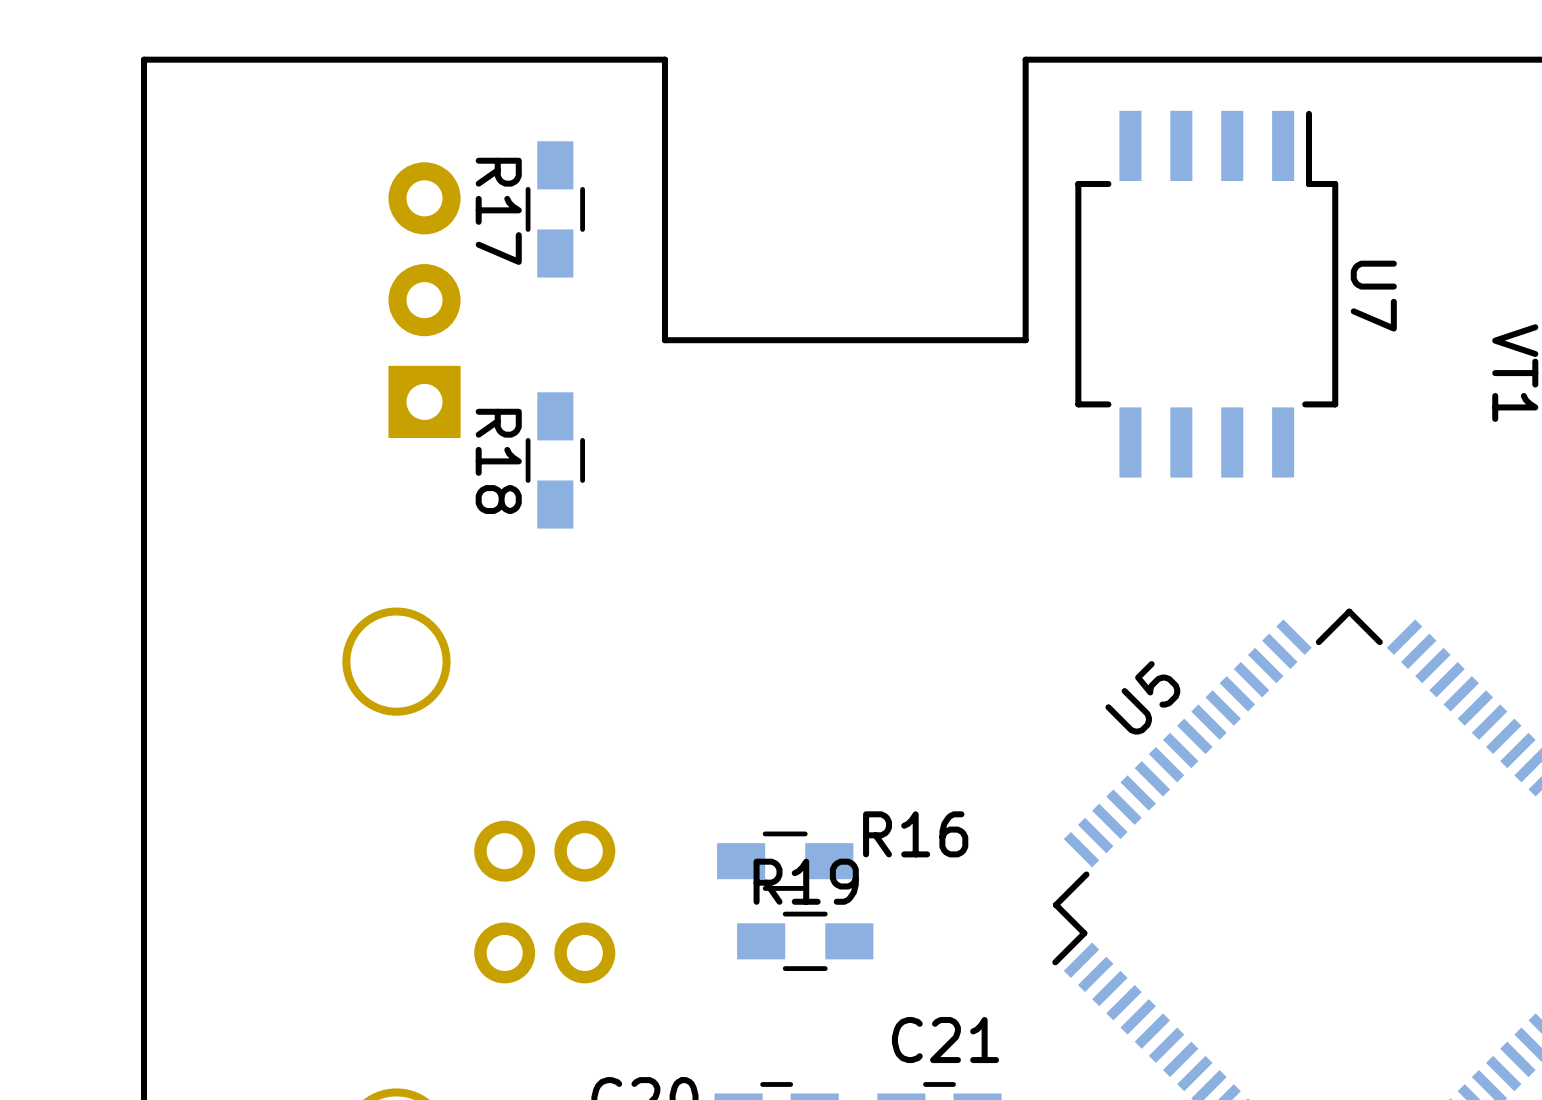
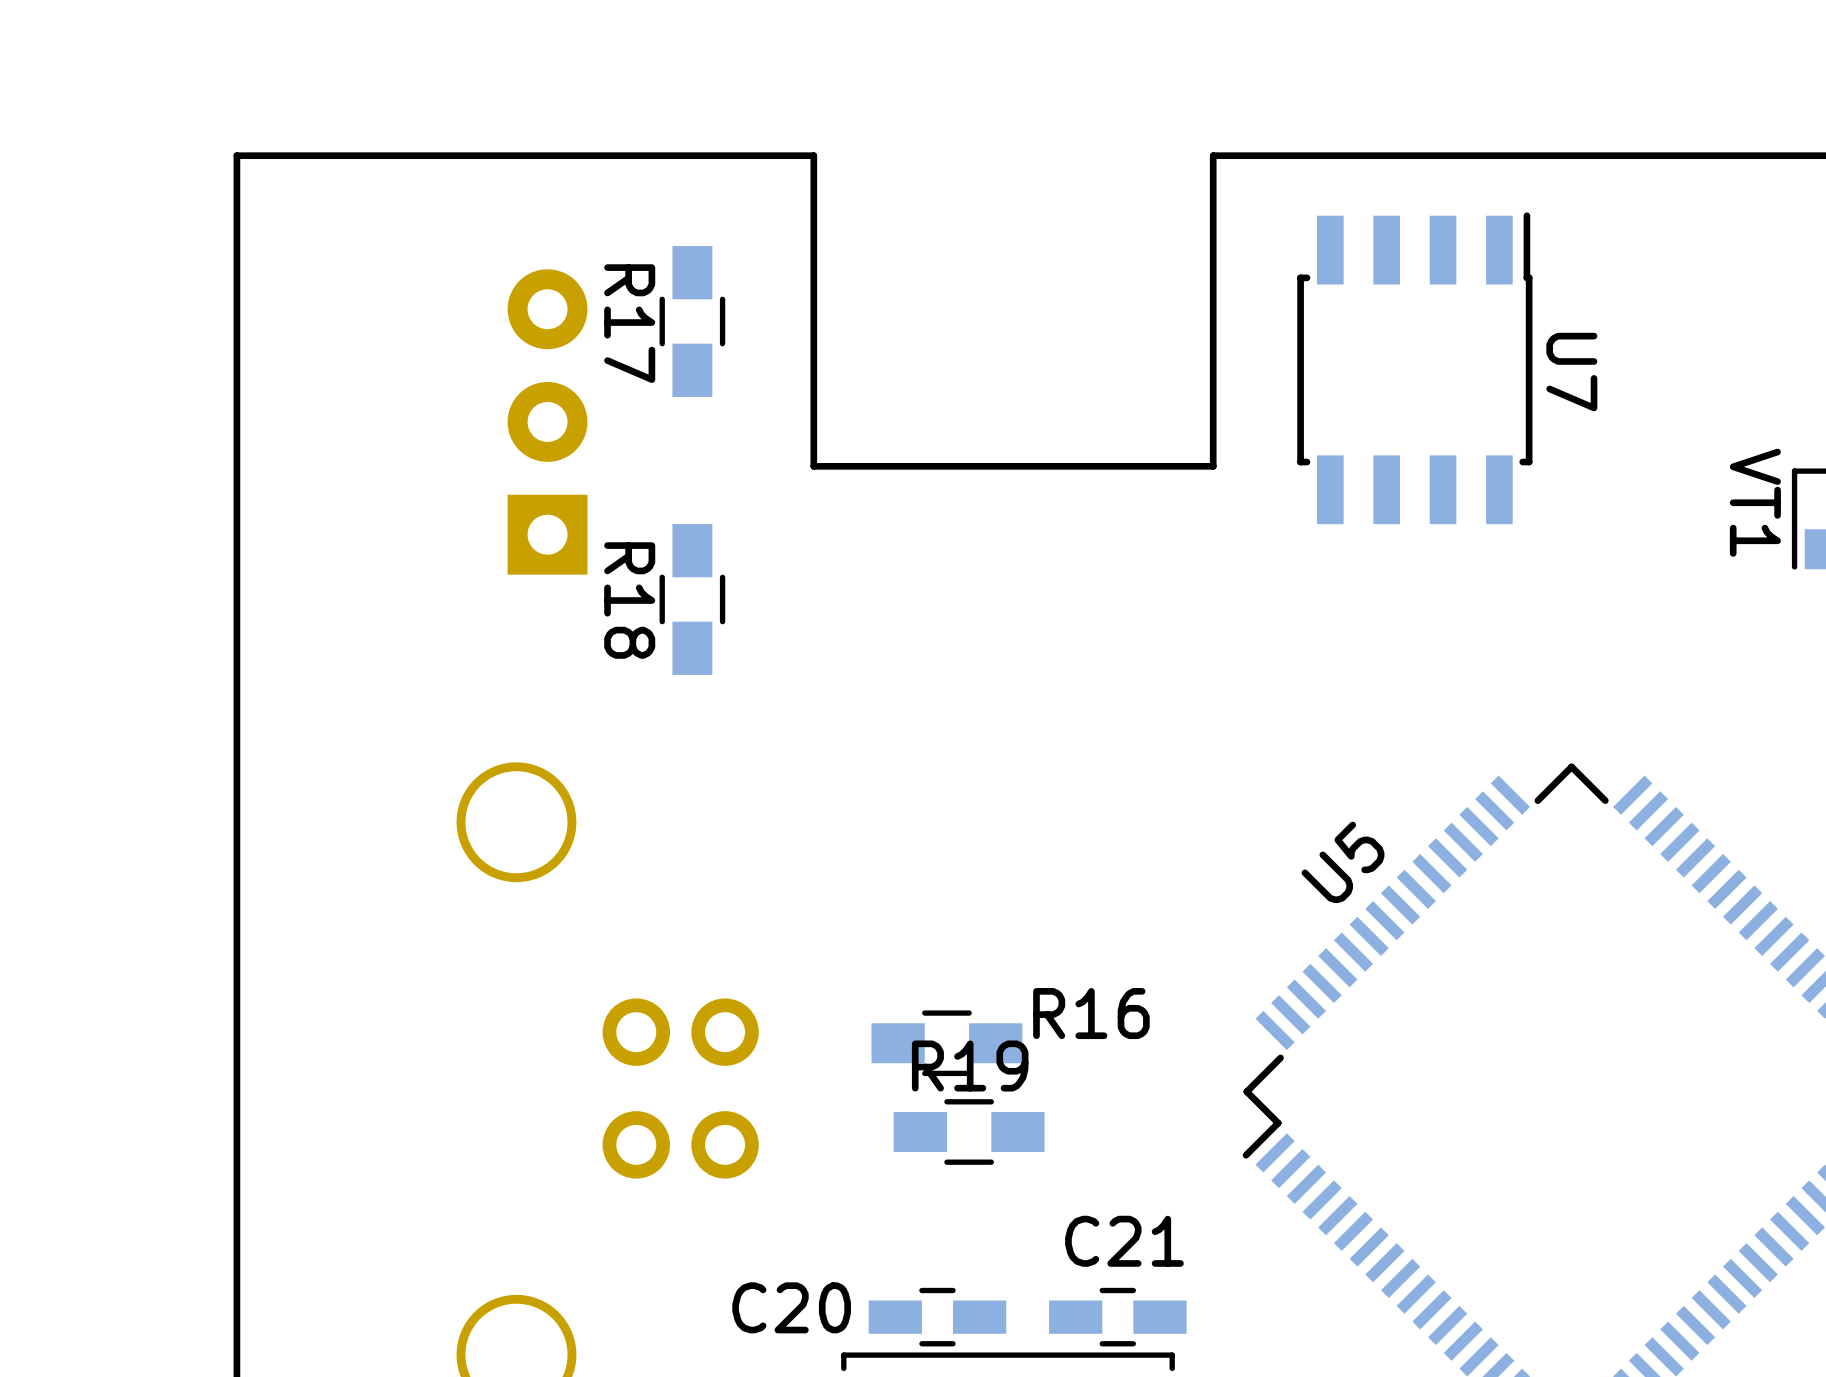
U7 footprint: [1075, 110, 1339, 478] -> [1297, 212, 1533, 525]

